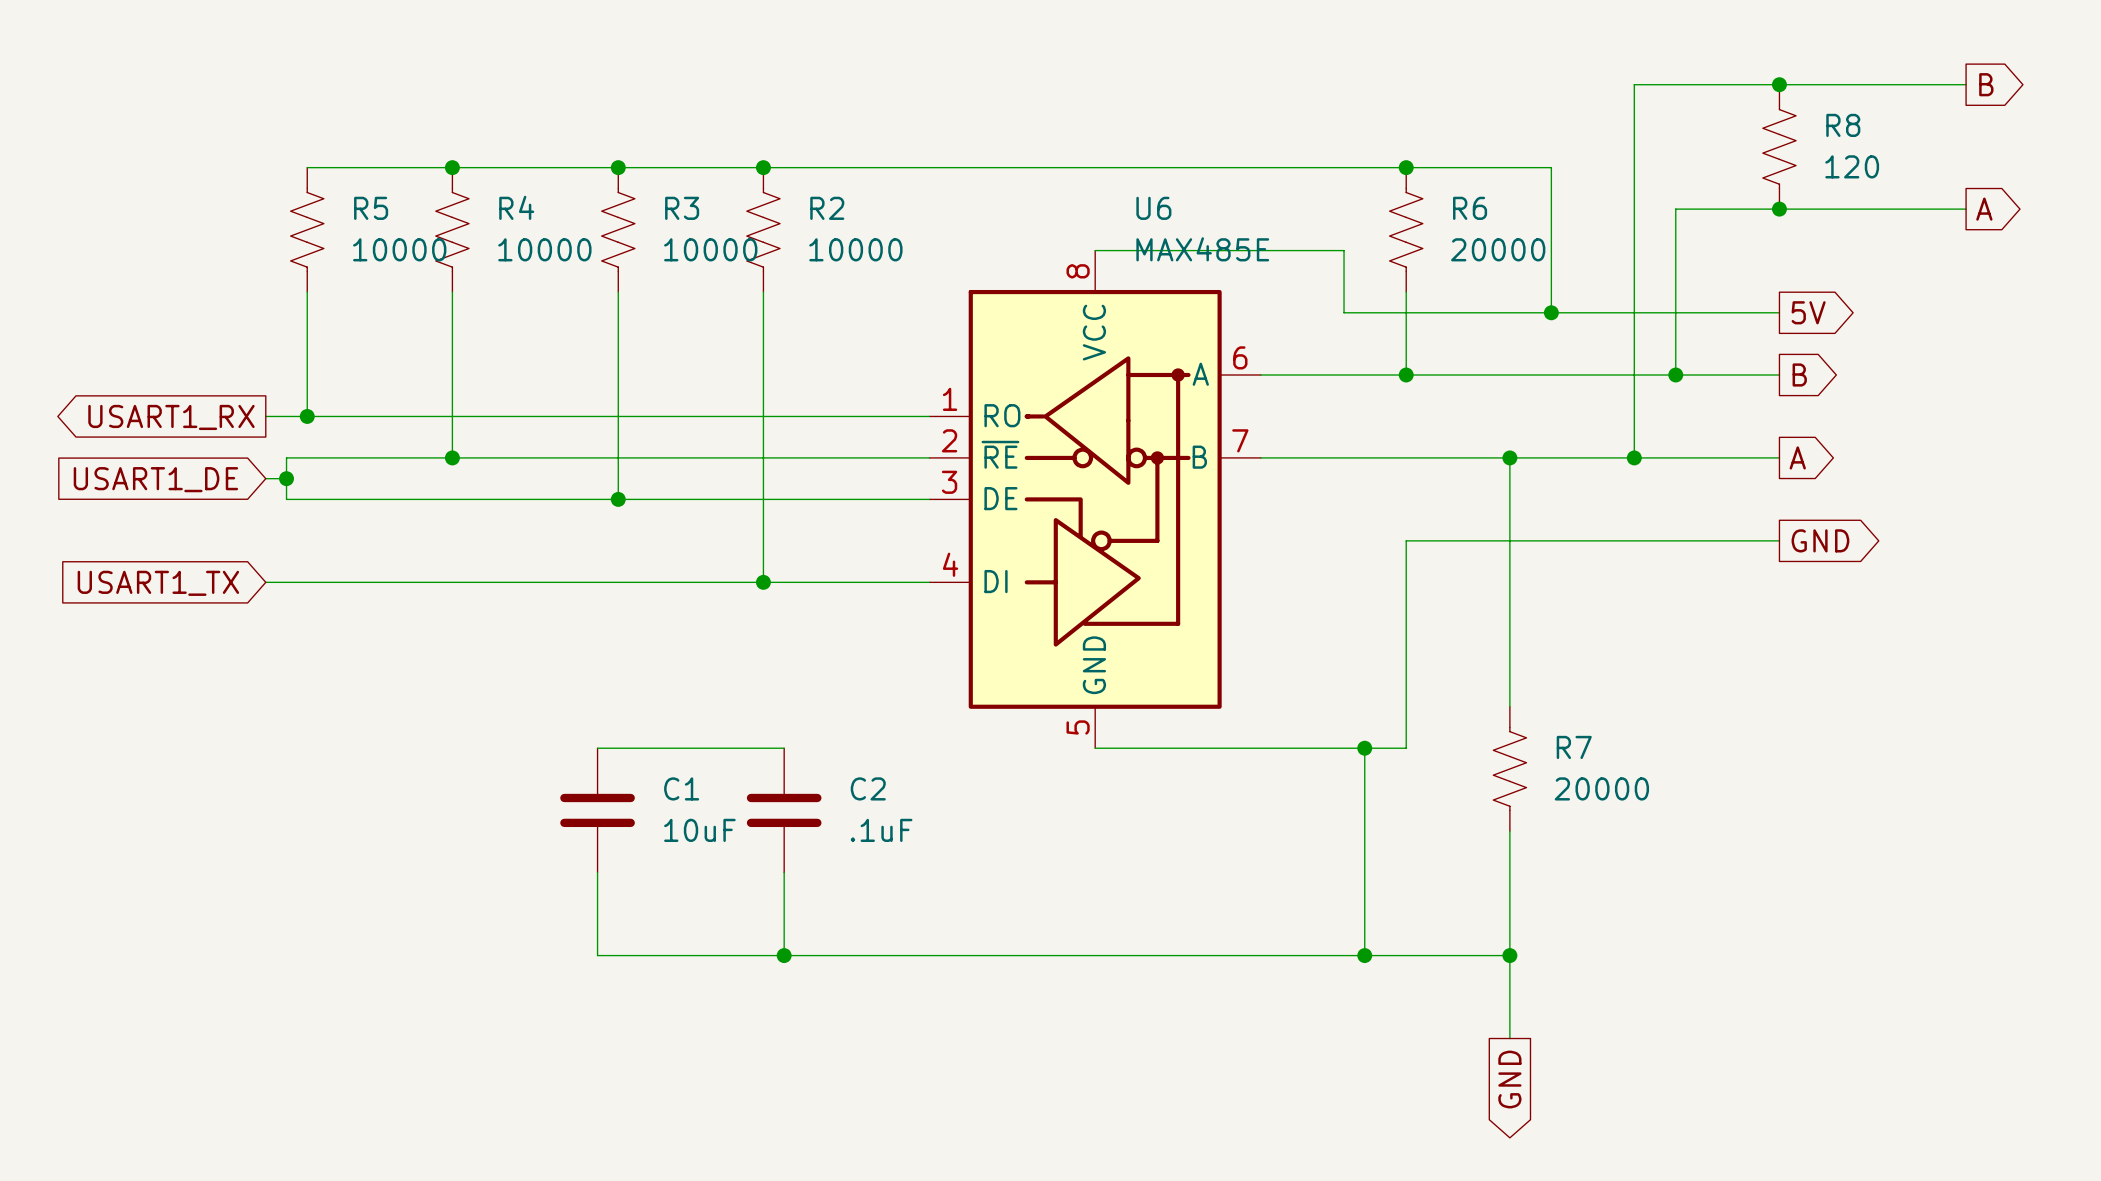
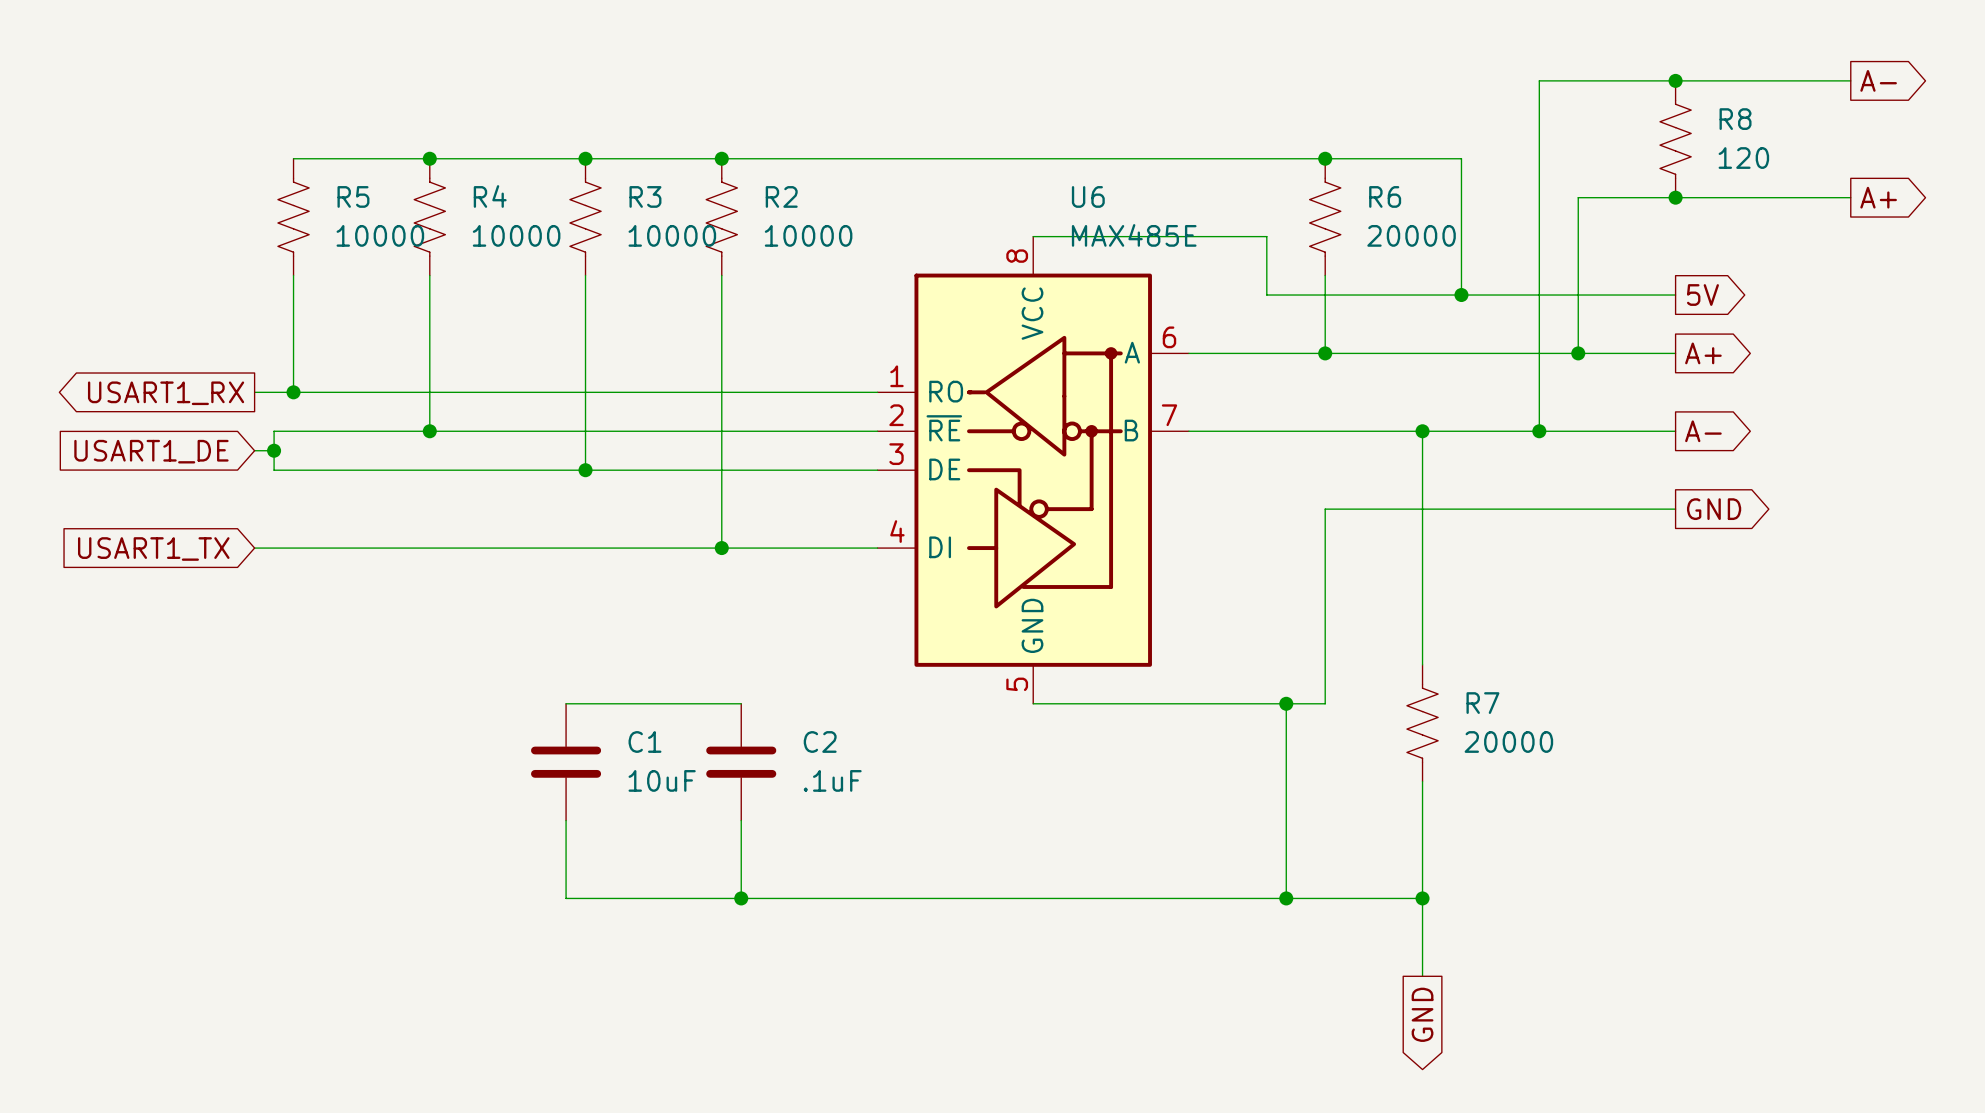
global label: B (1986, 84) -> A- (1878, 80)
global label: A (1984, 209) -> A+ (1878, 197)
global label: B (1799, 374) -> A+ (1703, 353)
global label: A (1797, 457) -> A- (1703, 431)

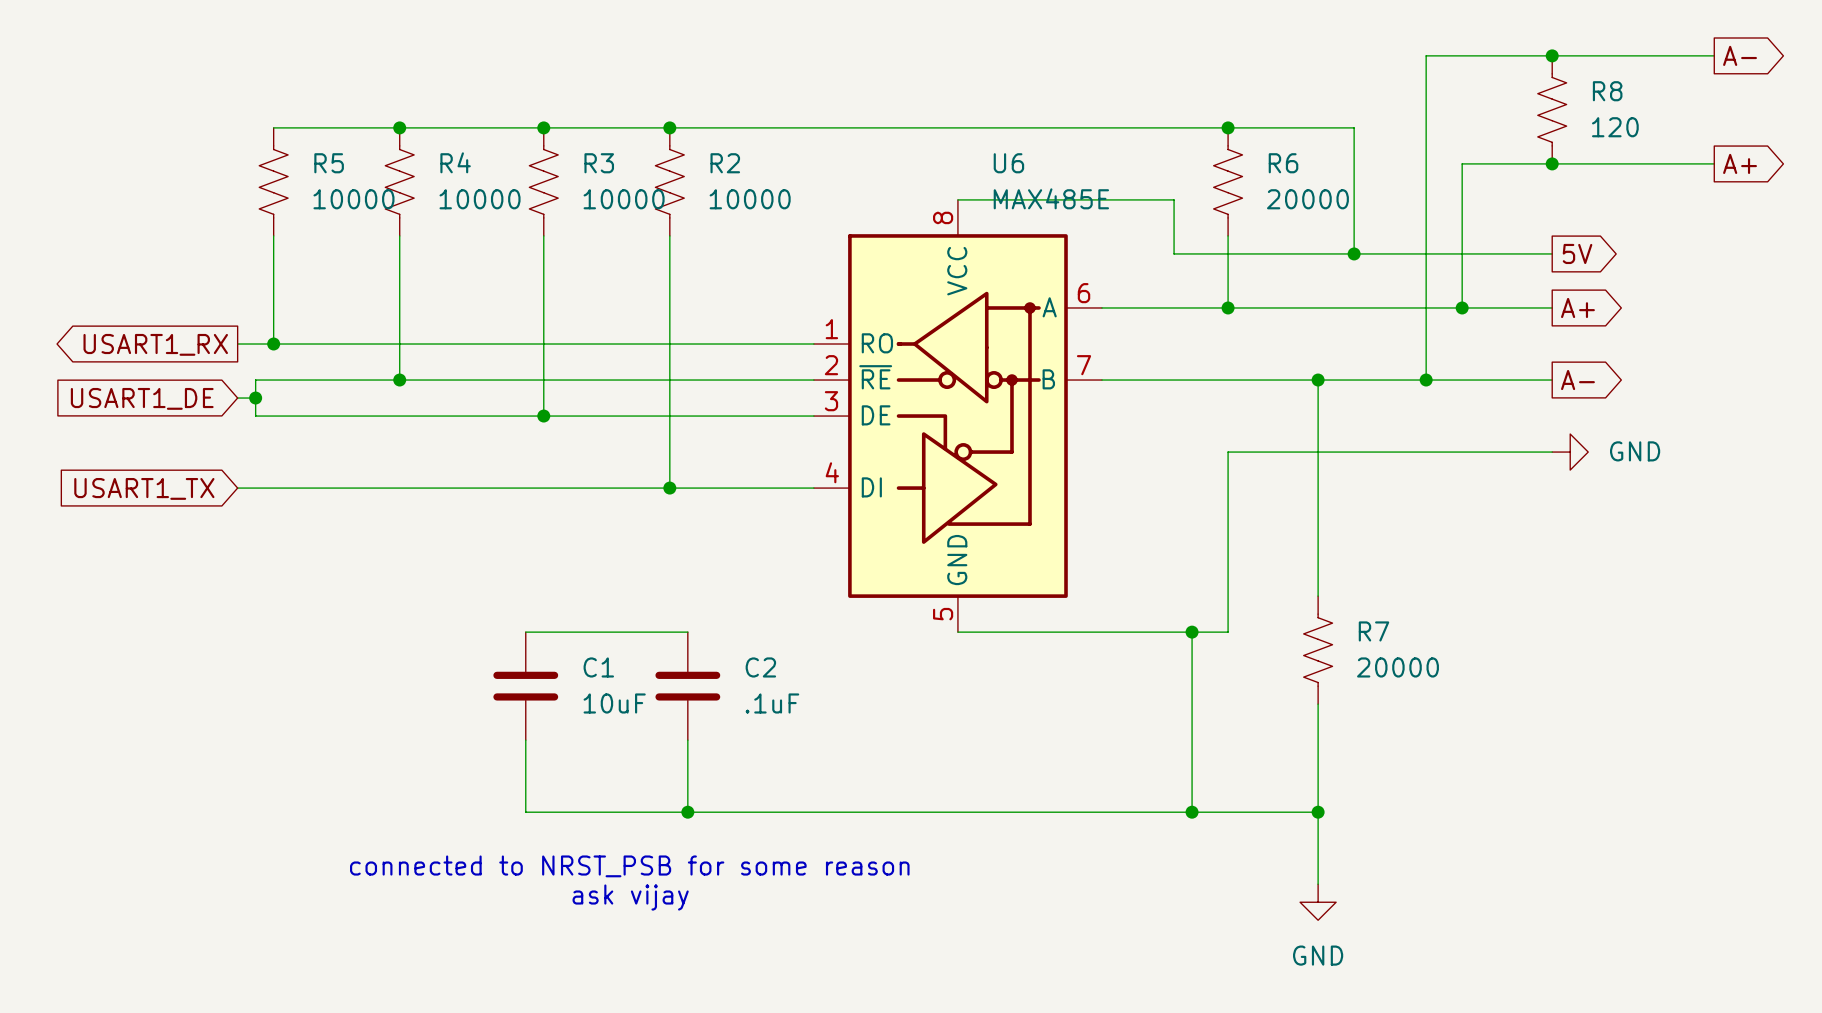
power symbol: none -> GND (1570, 452)
global label: GND (1714, 509) -> none
text: none -> connected to NRST_PSB for some reason (629, 866)
text: none -> ask vijay (630, 897)
power symbol: none -> GND (1318, 902)
global label: GND (1422, 1014) -> none

